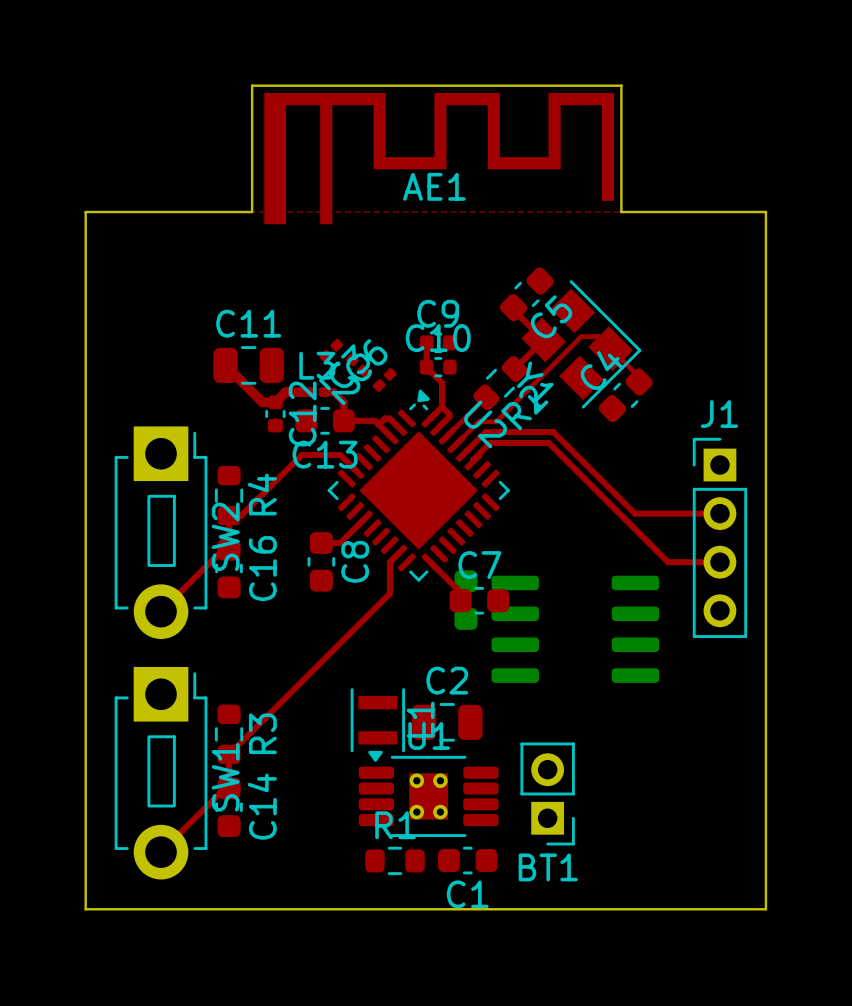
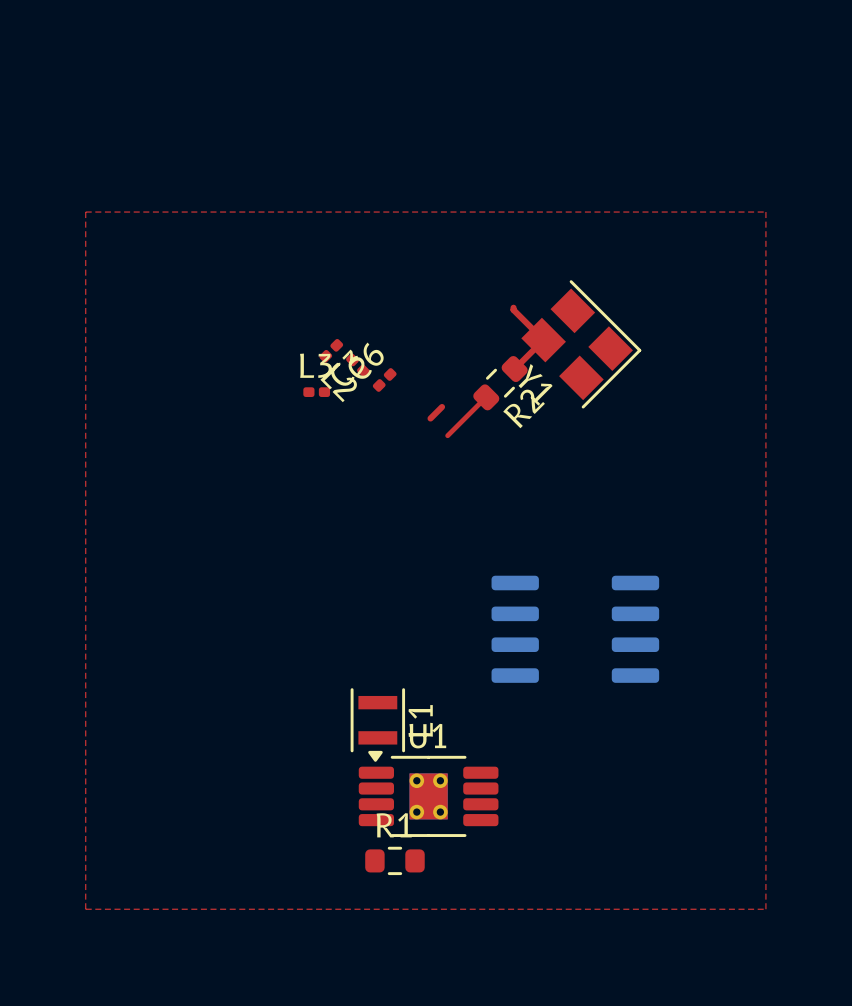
board edge: (252, 85) (621, 85) (621, 212) (765, 212) (765, 909) (85, 909) (85, 212) (252, 212) (252, 85) -> none
AE1: (439, 158) -> none
C5: (526, 294) -> none
top track: (426, 342) (426, 367) (442, 382) (442, 406) (449, 414) (439, 427) -> none
C9: (438, 342) -> none
top track: (225, 365) (262, 402) (275, 402) (285, 392) (308, 392) -> none
C11: (248, 365) -> none
C10: (438, 367) -> none
top track: (639, 382) (639, 377) (598, 336) (581, 336) (496, 421) (478, 421) (456, 444) -> none
top track: (324, 392) (333, 392) (343, 402) (343, 420) (374, 420) (389, 435) -> none
C4: (625, 395) -> none
C12: (275, 414) -> none
C13: (325, 420) -> none
top track: (378, 424) (385, 418) (389, 418) (398, 427) -> none
top track: (464, 452) (485, 432) (553, 432) (634, 513) (719, 513) -> none
top track: (473, 461) (490, 442) (548, 442) (668, 562) (719, 562) -> none
top track: (355, 470) (340, 454) (301, 454) (241, 515) (229, 515) (229, 549) (222, 549) (161, 611) -> none
U2: (418, 485) -> none
R4: (229, 495) -> none
top track: (363, 519) (340, 543) (321, 543) -> none
SW2: (161, 532) -> none
J1: (719, 537) -> none
top track: (398, 553) (389, 562) (389, 593) (229, 754) (229, 788) (224, 788) (161, 852) -> none
C8: (321, 561) -> none
top track: (430, 562) (460, 592) (460, 600) -> none
C16: (229, 568) -> none
part: (466, 600) -> none
C7: (479, 600) -> none
C2: (447, 722) -> none
R3: (229, 734) -> none
SW1: (161, 773) -> none
BT1: (547, 793) -> none
C14: (229, 807) -> none
C1: (467, 860) -> none

